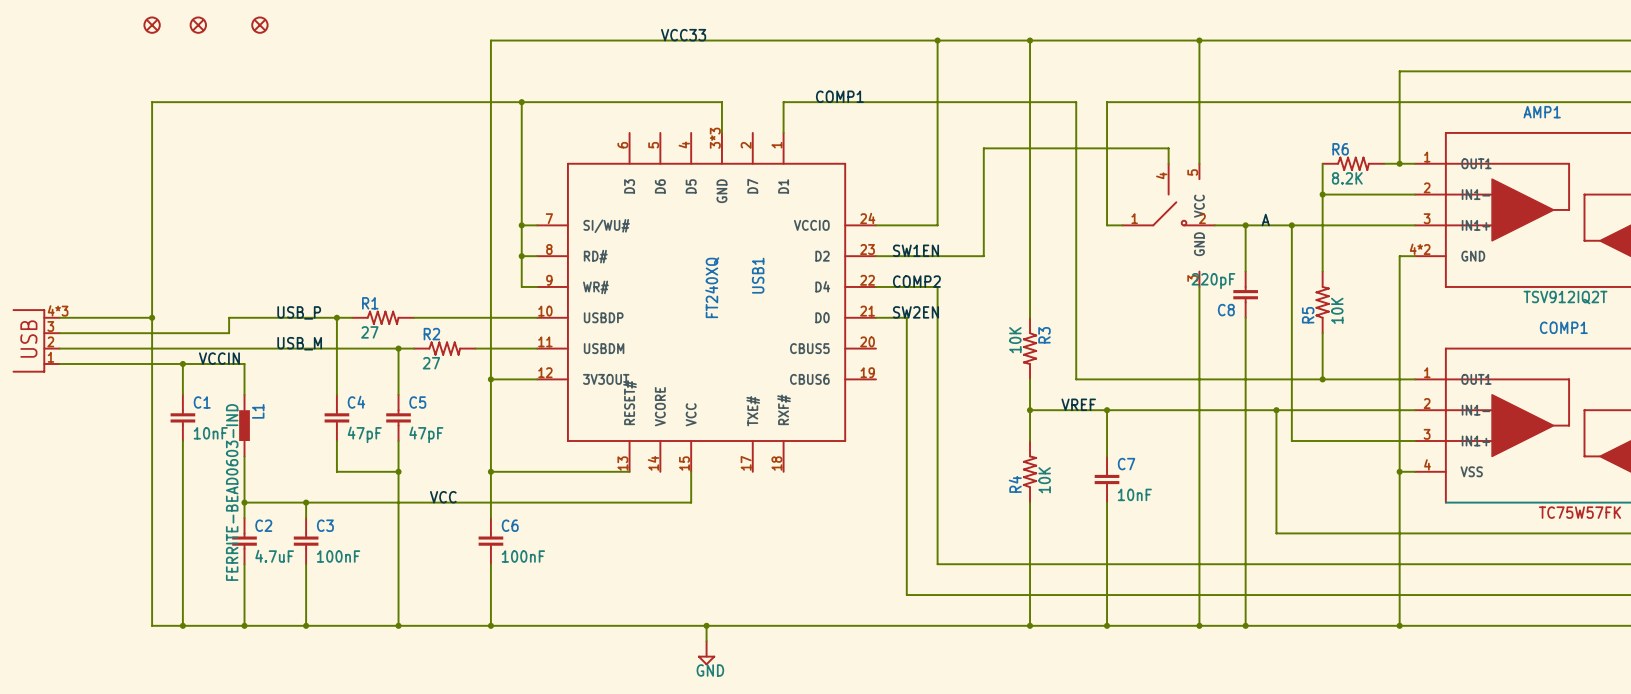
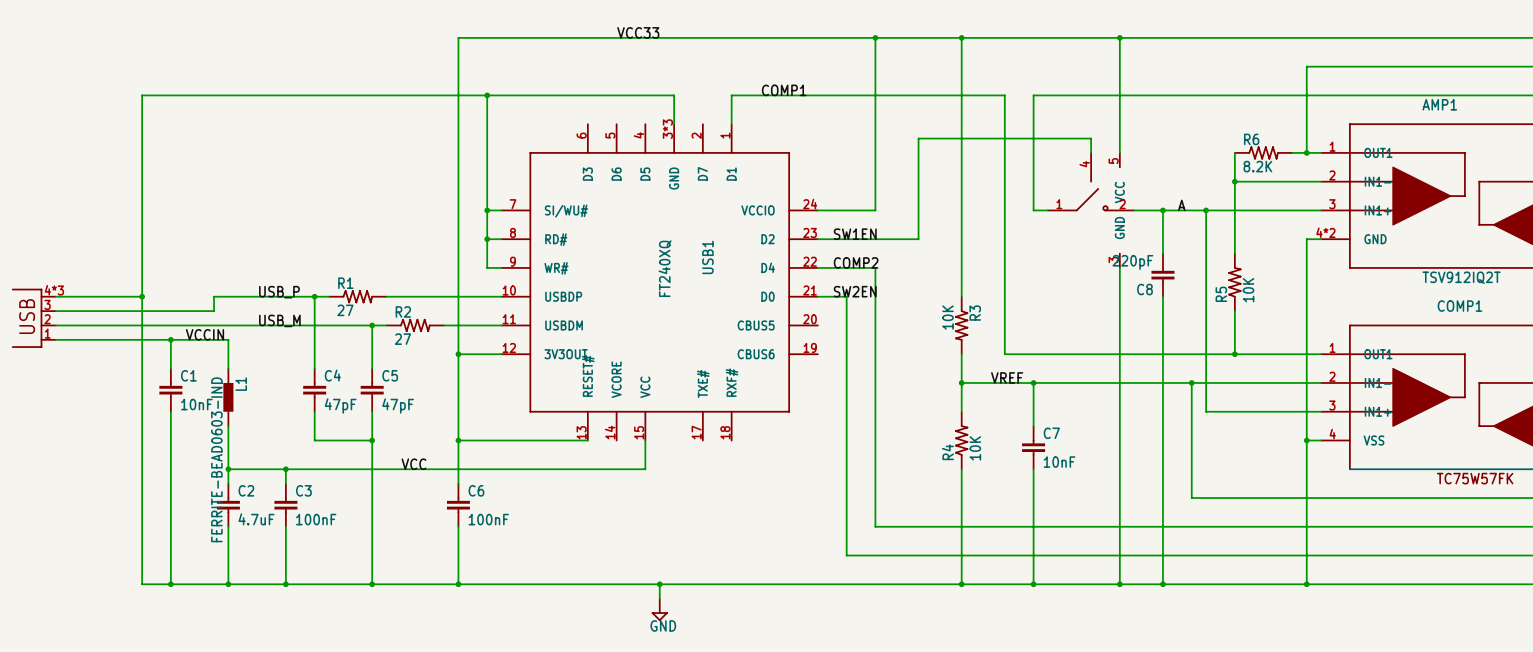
part: (152, 25) -> none
part: (198, 25) -> none
part: (259, 25) -> none

